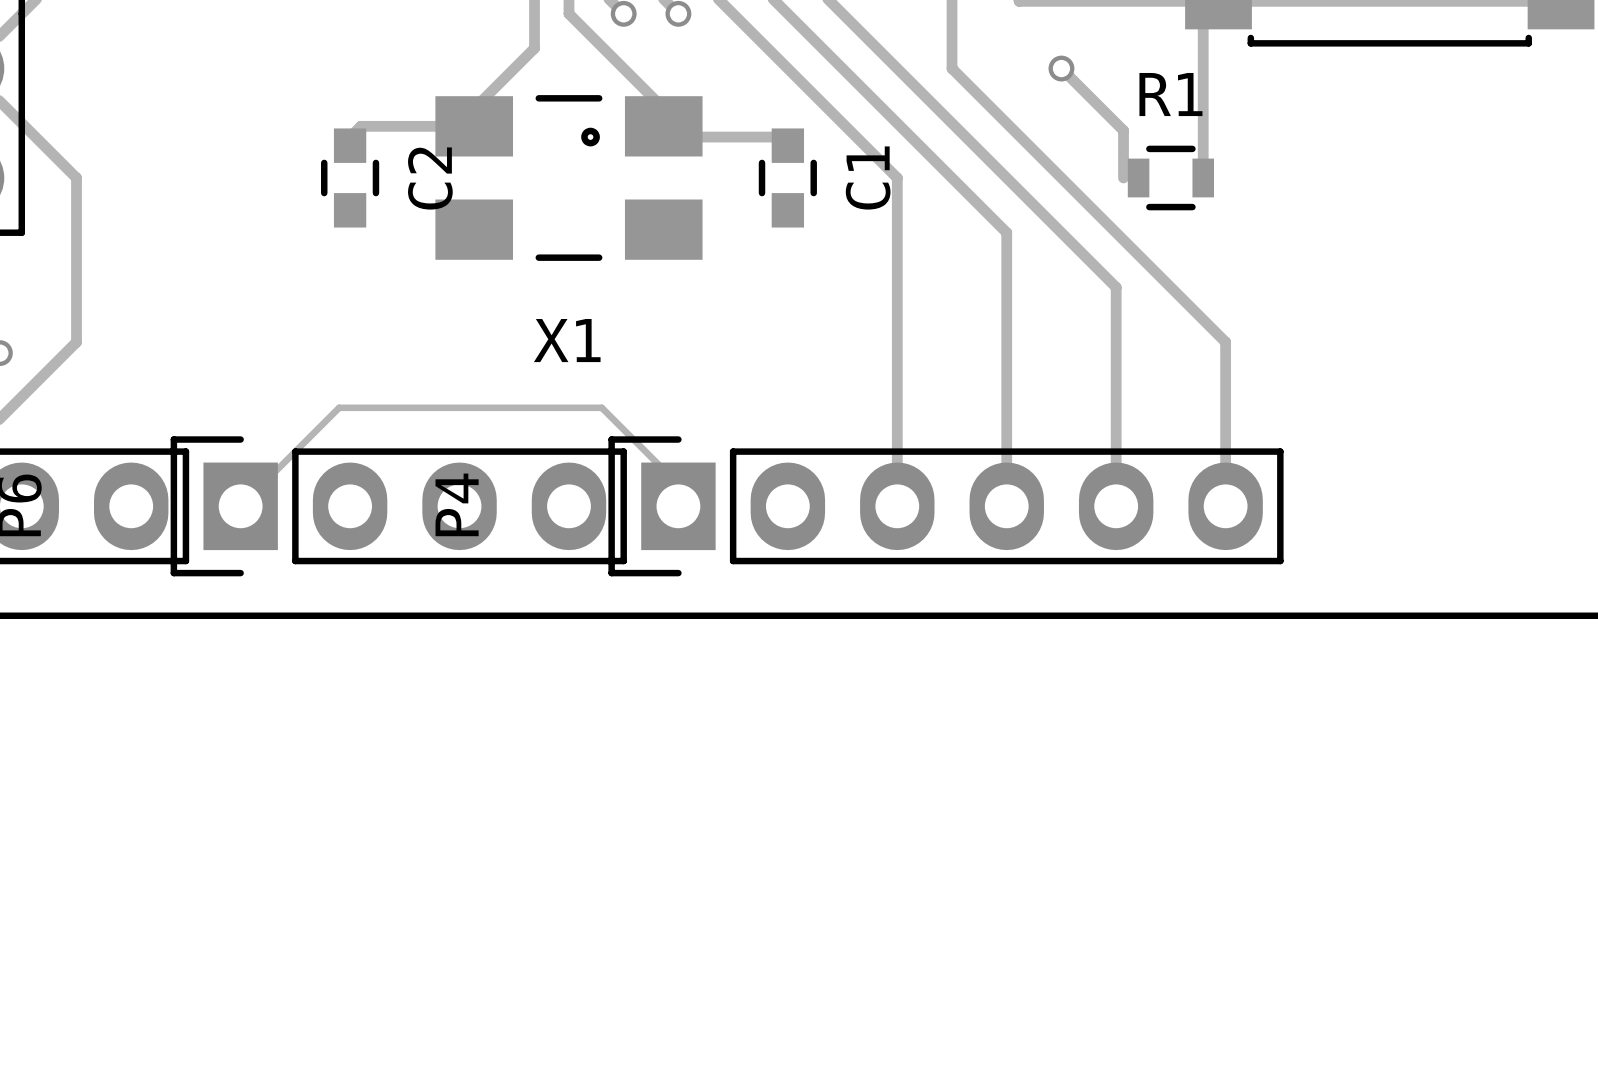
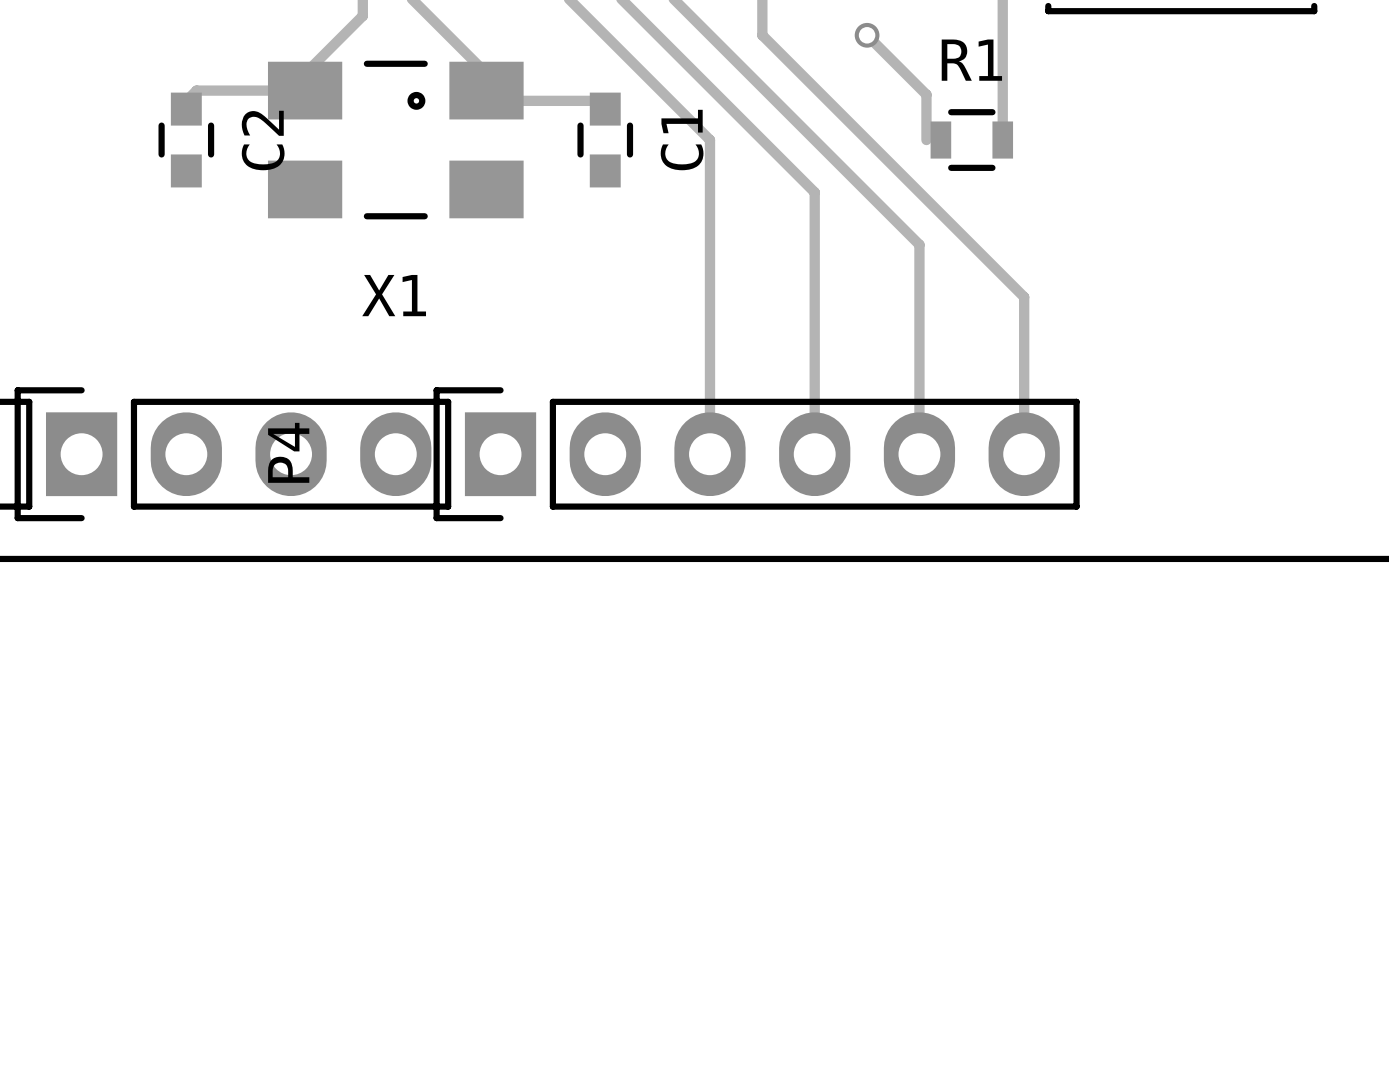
track: (240, 506) (339, 407) (601, 407) (678, 484) (678, 506) -> none

